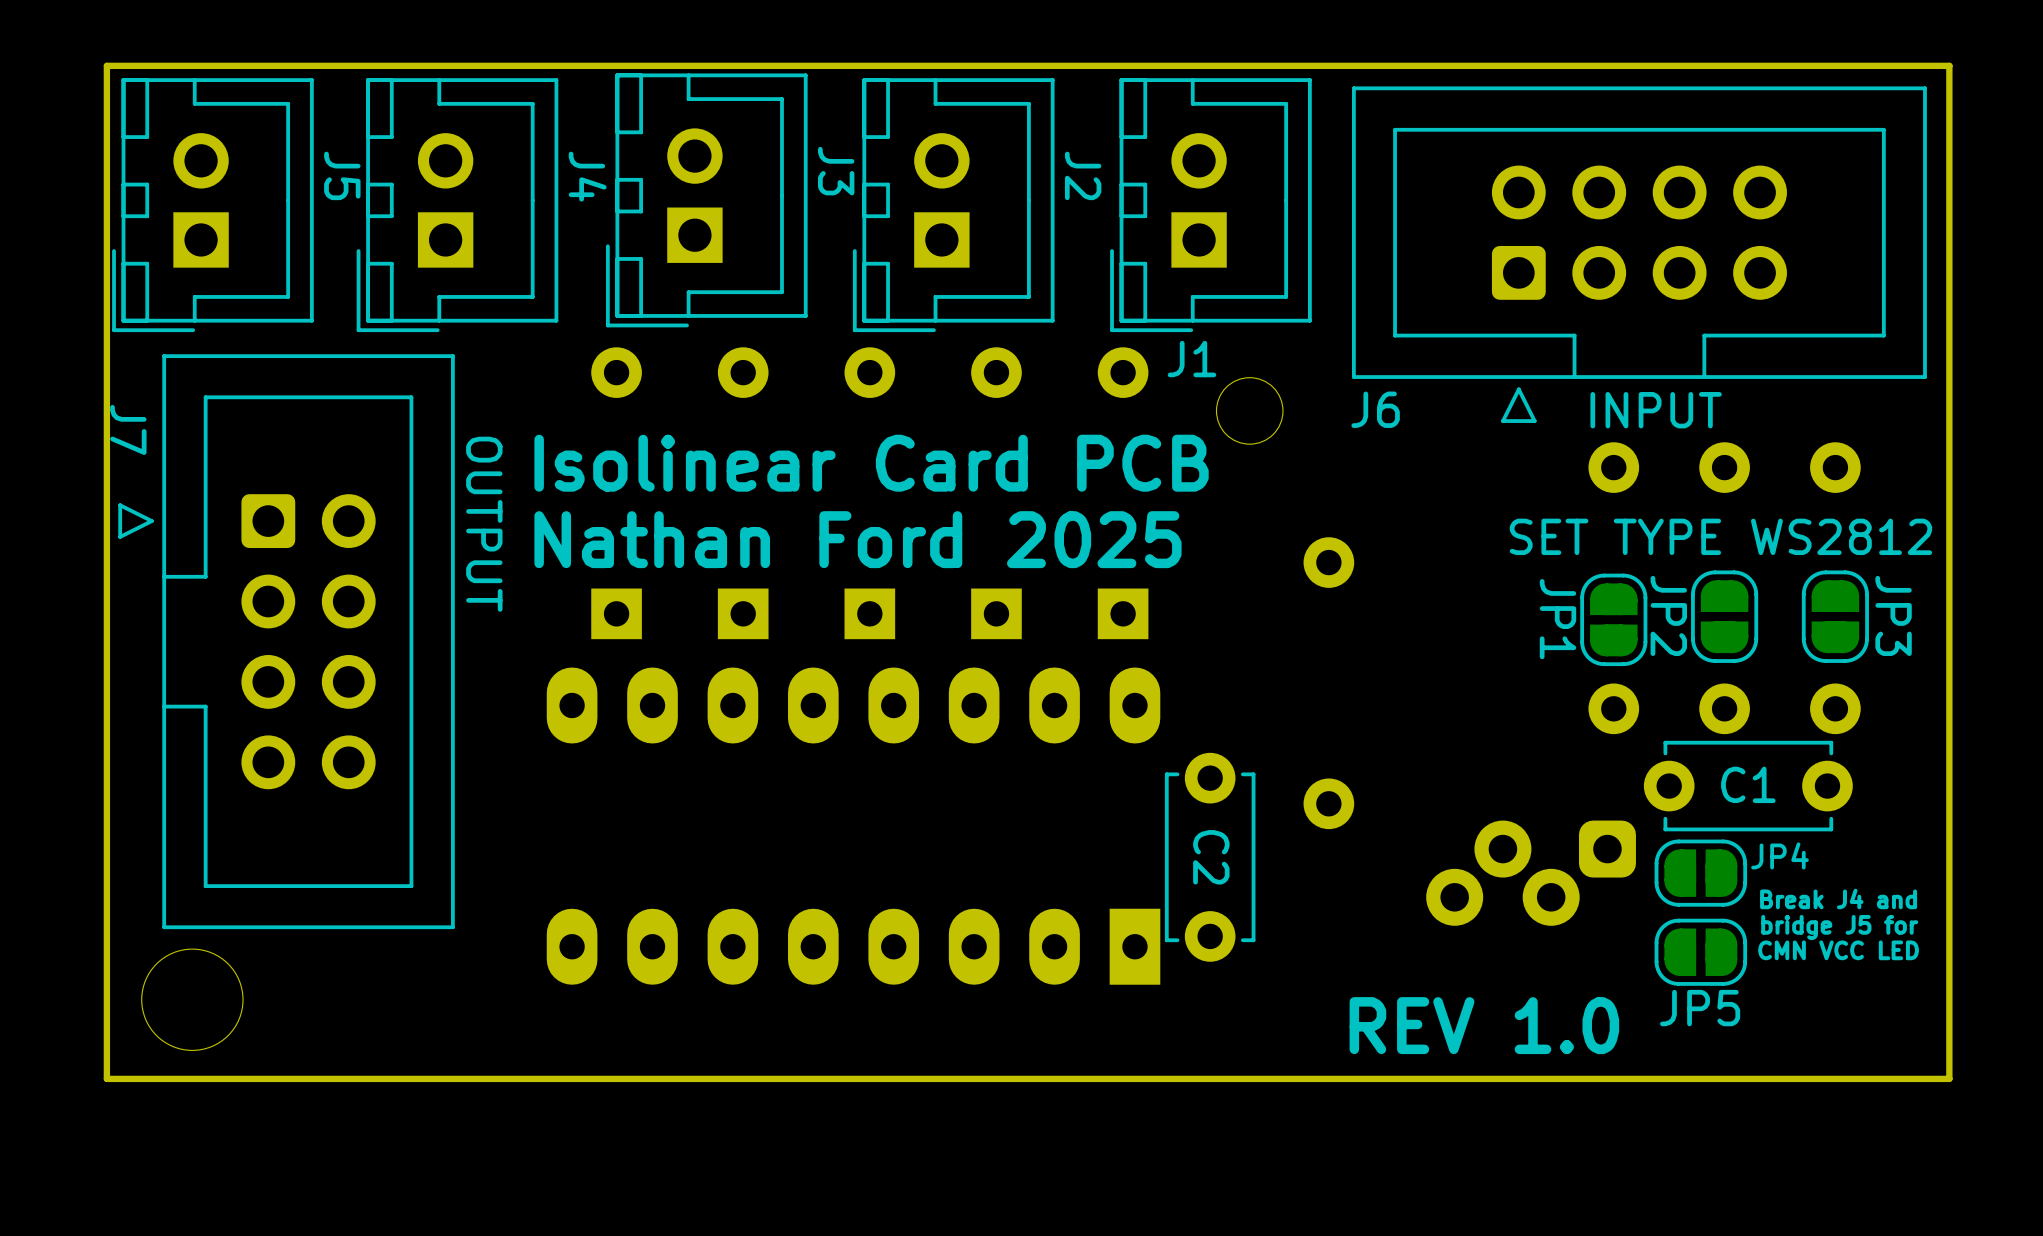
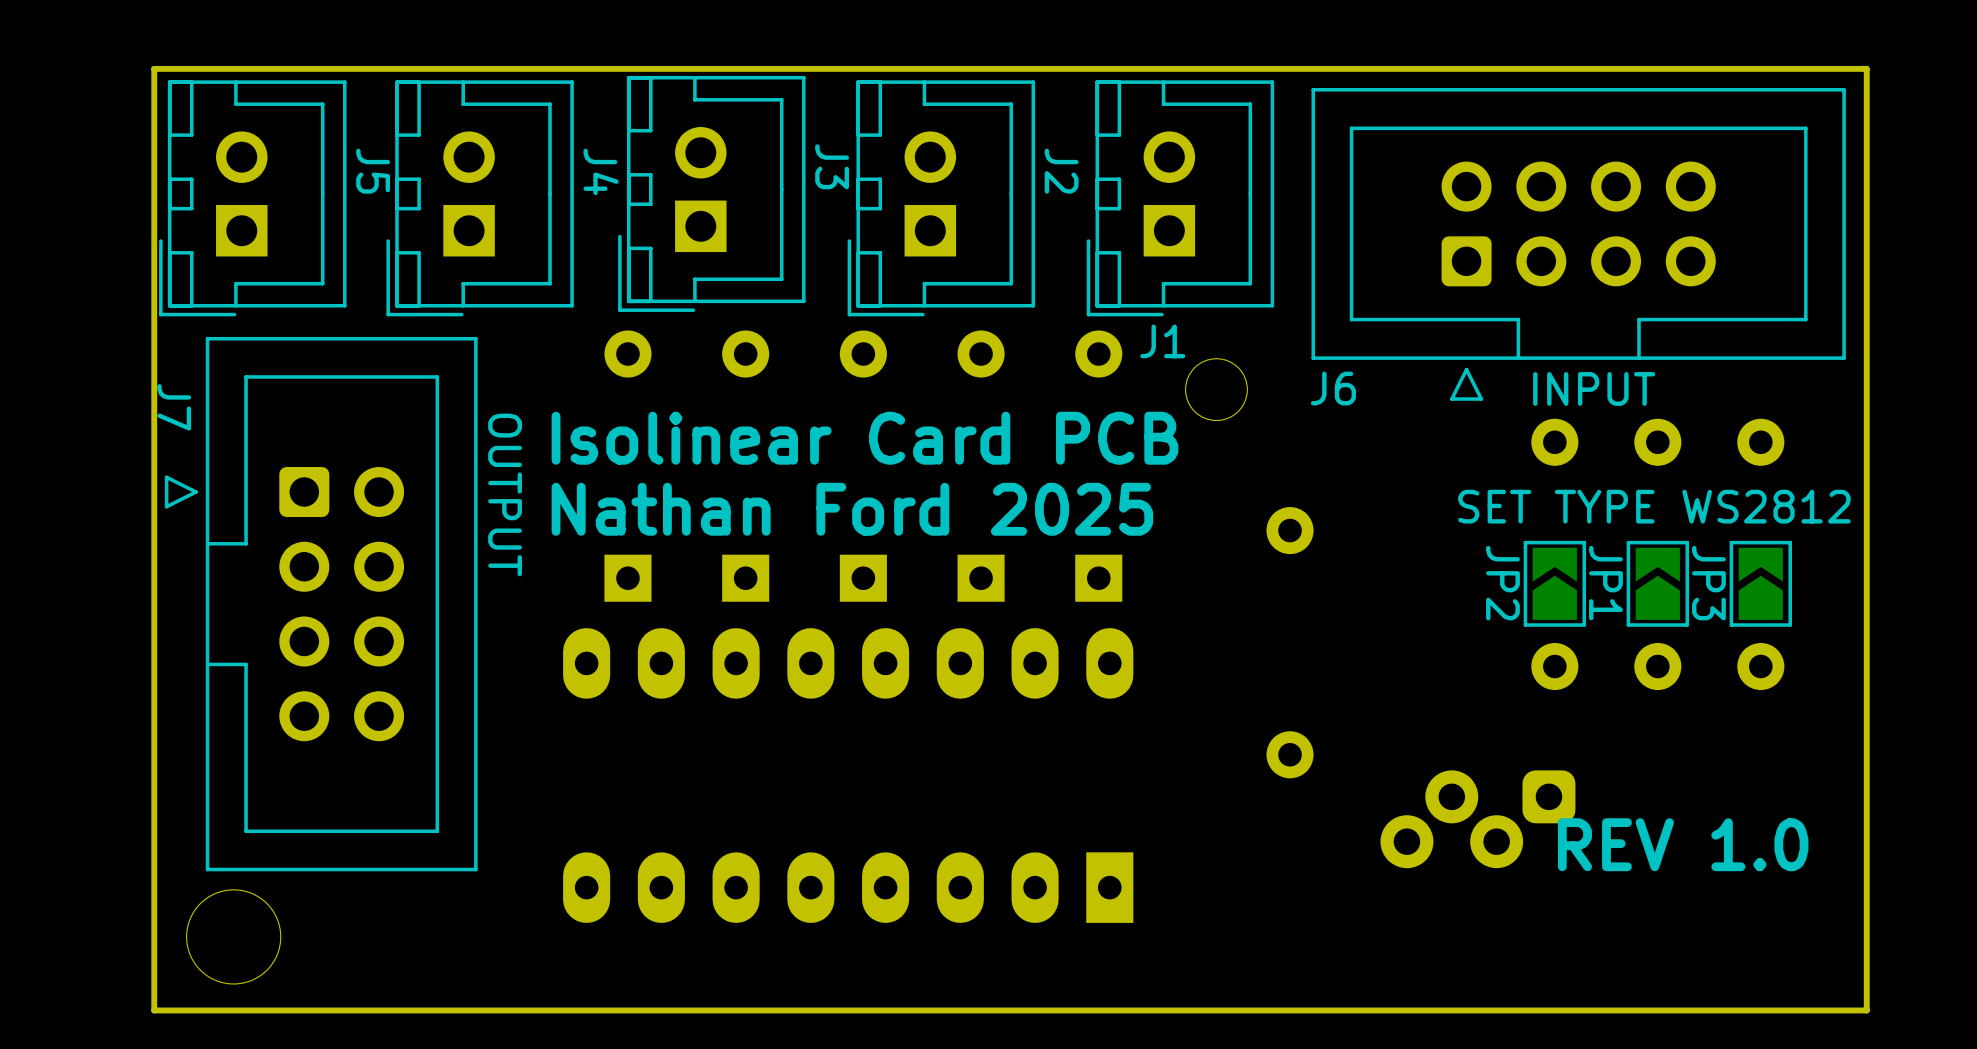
JP2 footprint: [1691, 570, 1759, 663] -> [1523, 540, 1587, 627]
JP3 footprint: [1801, 570, 1869, 663] -> [1729, 540, 1793, 627]
JP1 footprint: [1580, 573, 1648, 667] -> [1626, 540, 1690, 627]
JP3 name position: JP3 (1893, 615) -> JP3 (1708, 583)
C1: (1748, 786) -> none
C2: (1210, 857) -> none
JP4: (1700, 873) -> none
text: Break J4 and (1838, 898) -> none
text: bridge J5 for (1839, 927) -> none
text: CMN VCC LED (1838, 950) -> none
JP5: (1700, 952) -> none
text position: REV 1.0 (1484, 1025) -> REV 1.0 (1683, 844)

